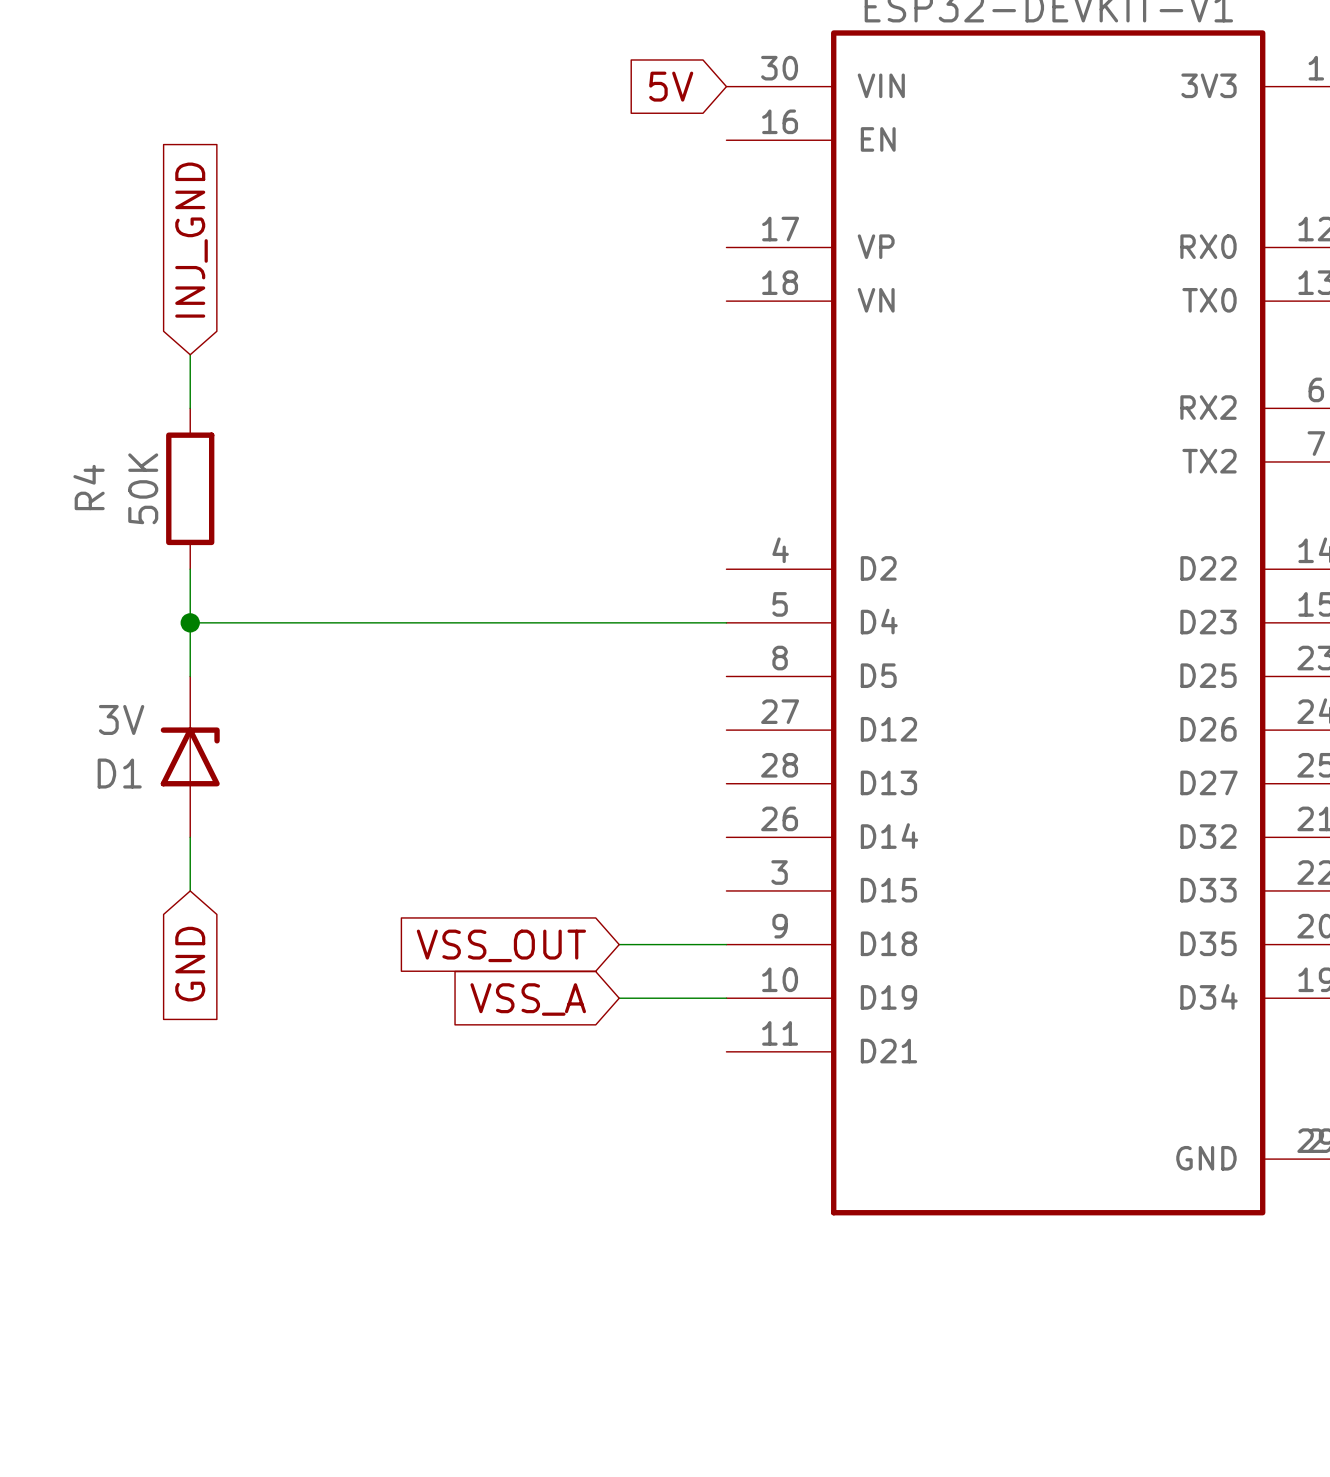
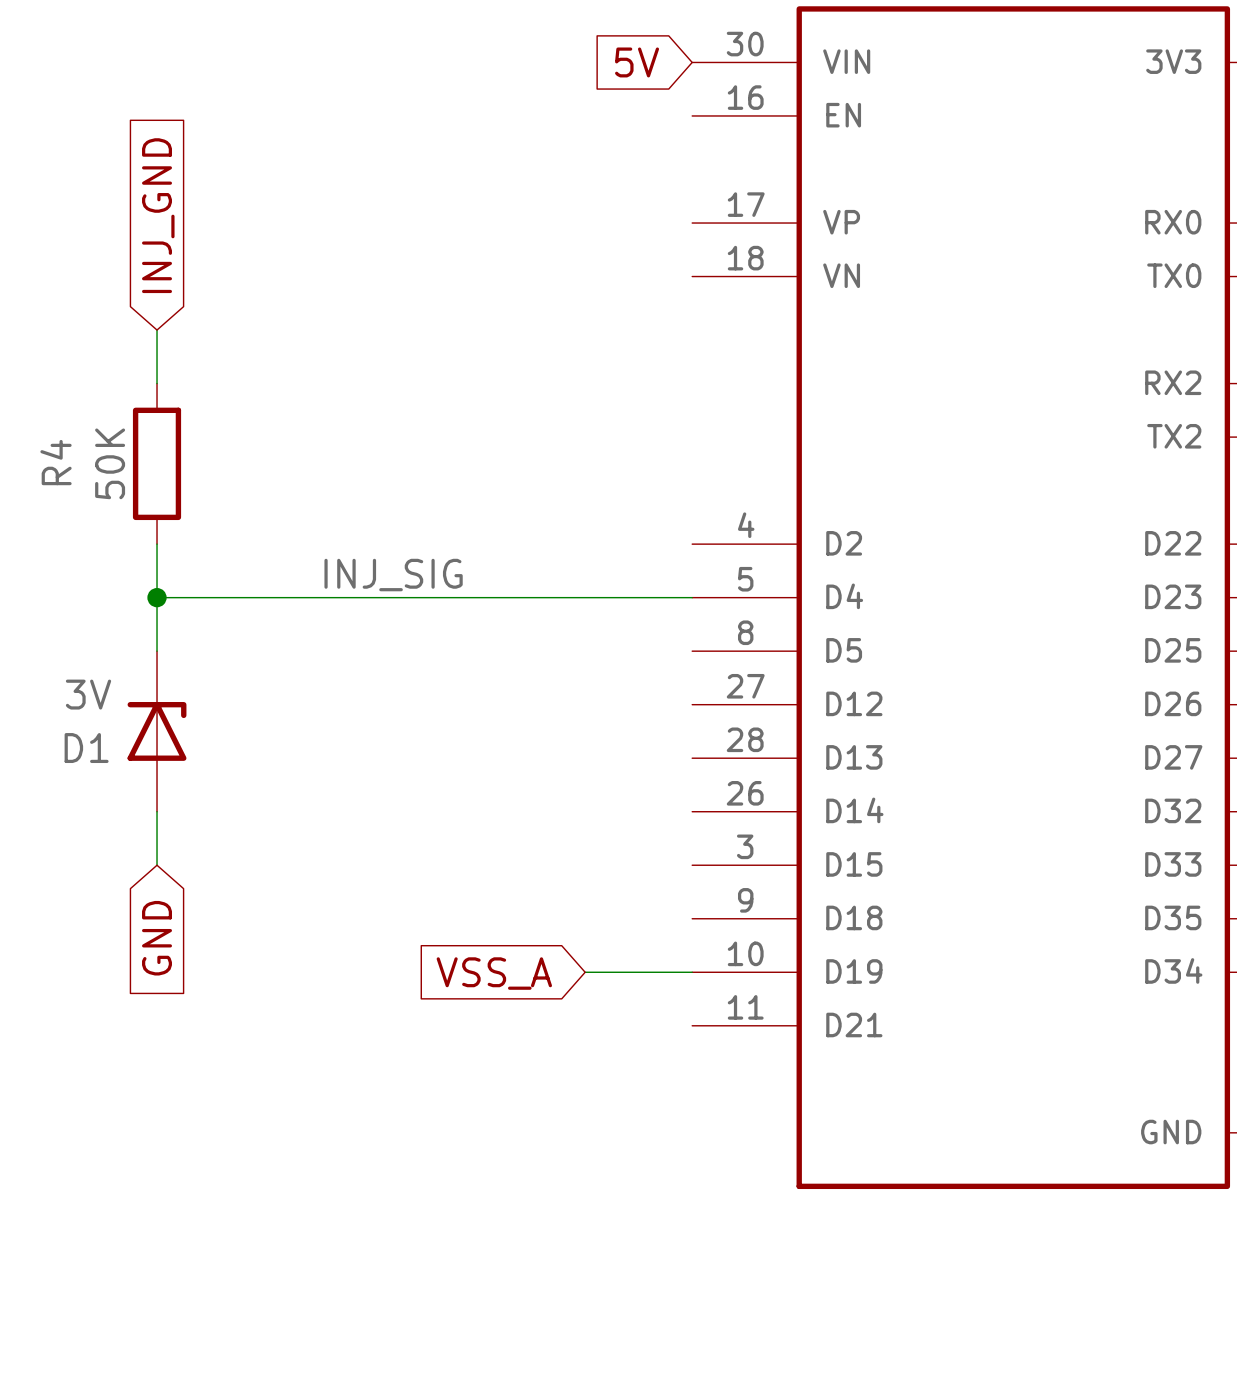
label: none -> INJ_SIG (393, 575)
wire: (619, 944) (726, 944) -> none
global label: VSS_OUT (501, 945) -> none

